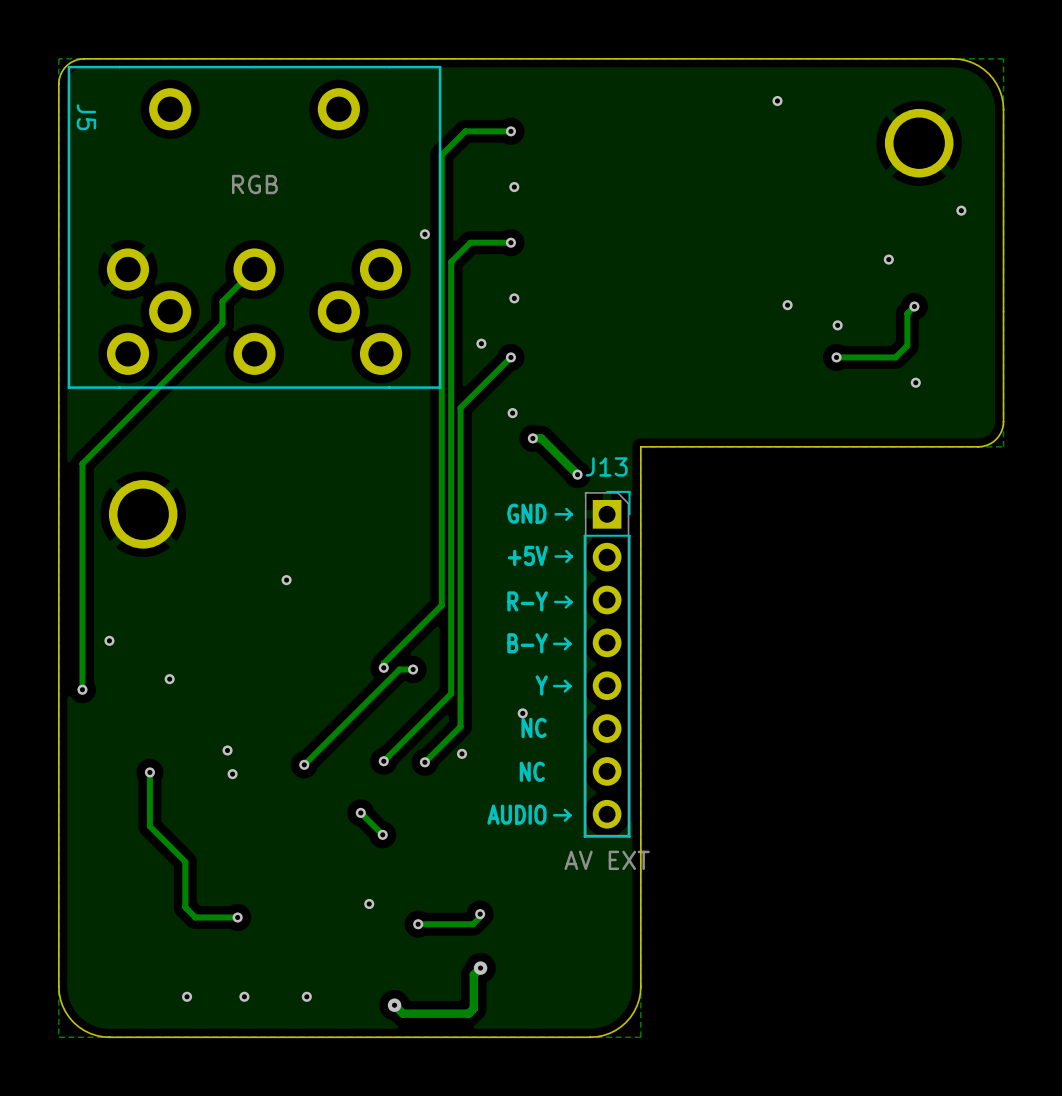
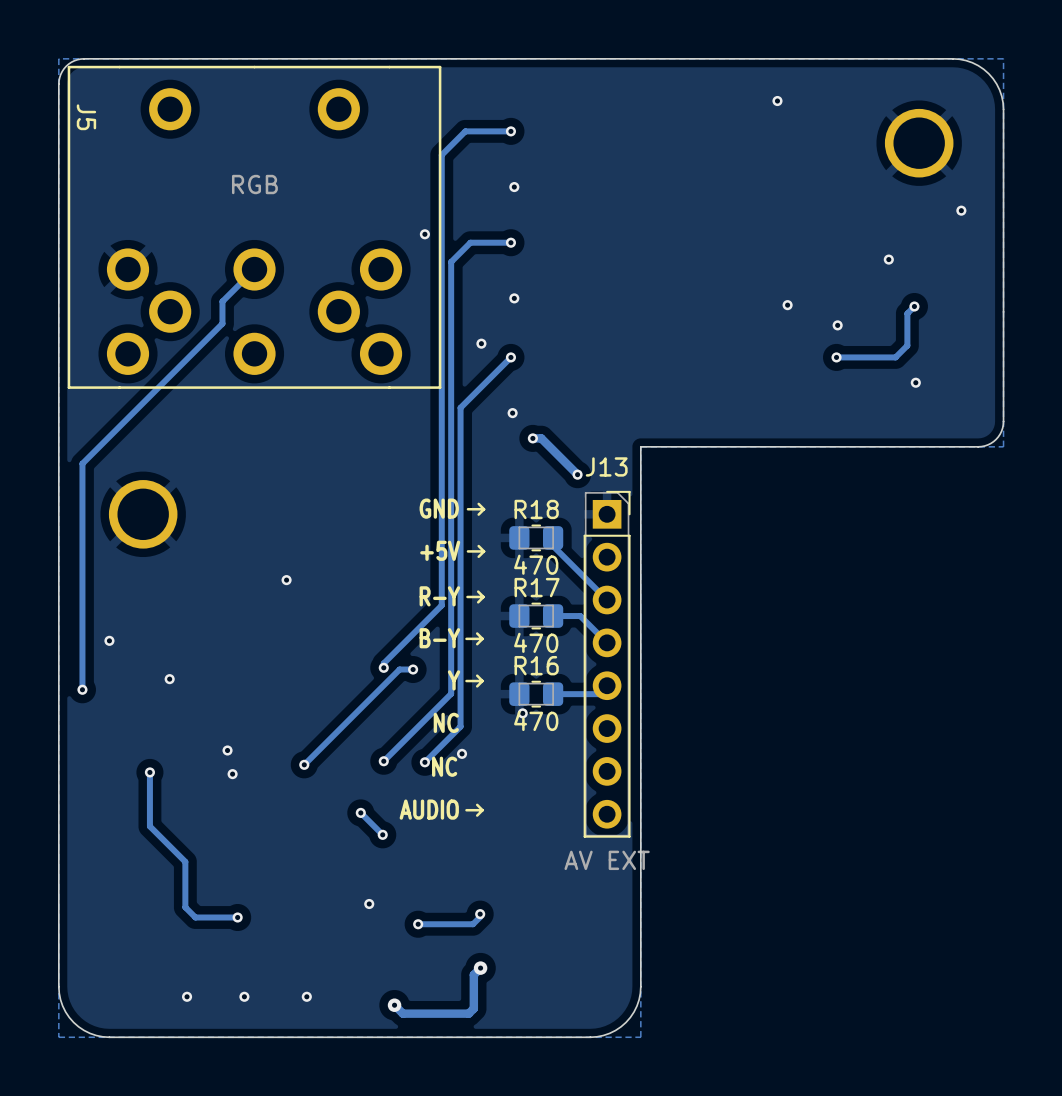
line: (566, 508) (571, 514) -> (478, 503) (484, 509)
text position: GND (526, 513) -> GND (439, 508)
line: (571, 514) (555, 514) -> (484, 509) (467, 509)
line: (571, 514) (566, 519) -> (484, 509) (478, 514)
R18: none -> 470 (536, 537)
track: none -> (553, 537) (553, 546) (607, 600)
line: (566, 551) (571, 556) -> (478, 546) (484, 551)
text position: +5V (527, 555) -> +5V (440, 550)
line: (571, 556) (555, 556) -> (484, 551) (467, 551)
line: (571, 556) (566, 561) -> (484, 551) (478, 556)
line: (565, 596) (571, 602) -> (478, 591) (483, 596)
text position: R-Y (527, 601) -> R-Y (439, 596)
line: (571, 602) (555, 602) -> (483, 596) (467, 596)
line: (571, 602) (565, 607) -> (483, 596) (478, 602)
R17: none -> 470 (536, 616)
track: none -> (553, 616) (580, 616) (607, 642)
line: (564, 638) (570, 643) -> (477, 633) (482, 638)
text position: B-Y (527, 643) -> B-Y (439, 638)
line: (570, 643) (564, 649) -> (482, 638) (477, 644)
line: (570, 643) (554, 643) -> (482, 638) (466, 638)
line: (564, 680) (570, 686) -> (477, 675) (482, 681)
text position: Y (541, 685) -> Y (454, 680)
track: none -> (607, 685) (598, 694) (553, 694)
line: (570, 686) (564, 691) -> (482, 681) (477, 686)
line: (570, 686) (554, 686) -> (482, 681) (466, 681)
R16: none -> 470 (536, 694)
text: none -> NC (446, 722)
text: NC (534, 727) -> none
text: none -> NC (444, 766)
text: NC (532, 771) -> none
line: (564, 809) (570, 815) -> (477, 804) (482, 810)
text position: AUDIO (516, 814) -> AUDIO (429, 809)
line: (570, 815) (564, 820) -> (482, 810) (477, 815)
line: (570, 815) (554, 815) -> (482, 810) (466, 810)

